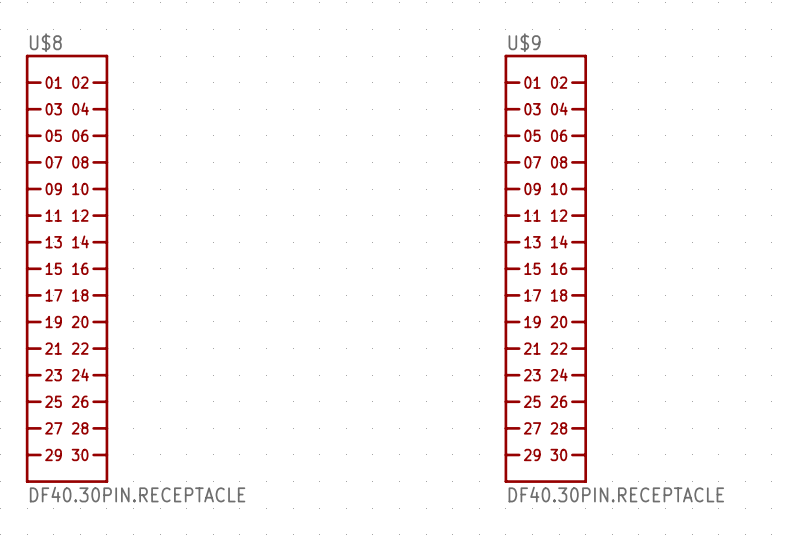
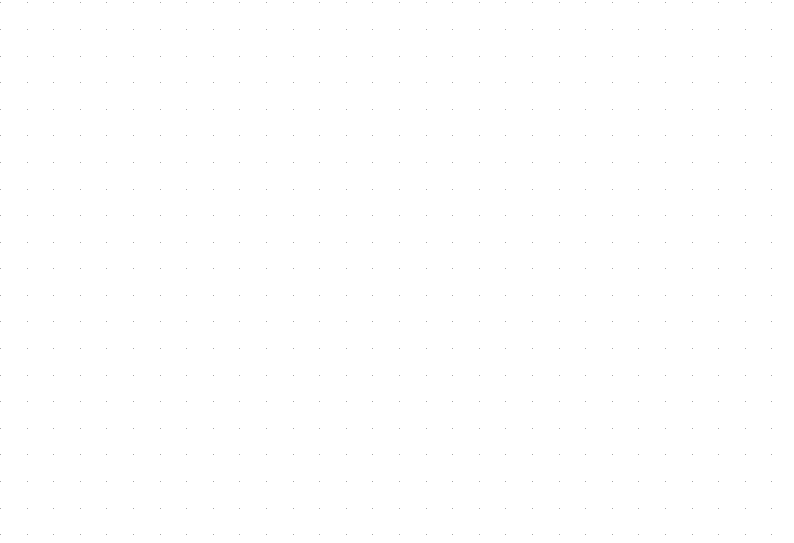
U$8: DF40.30PIN.RECEPTACLE (67, 268) -> none
U$9: DF40.30PIN.RECEPTACLE (545, 268) -> none

